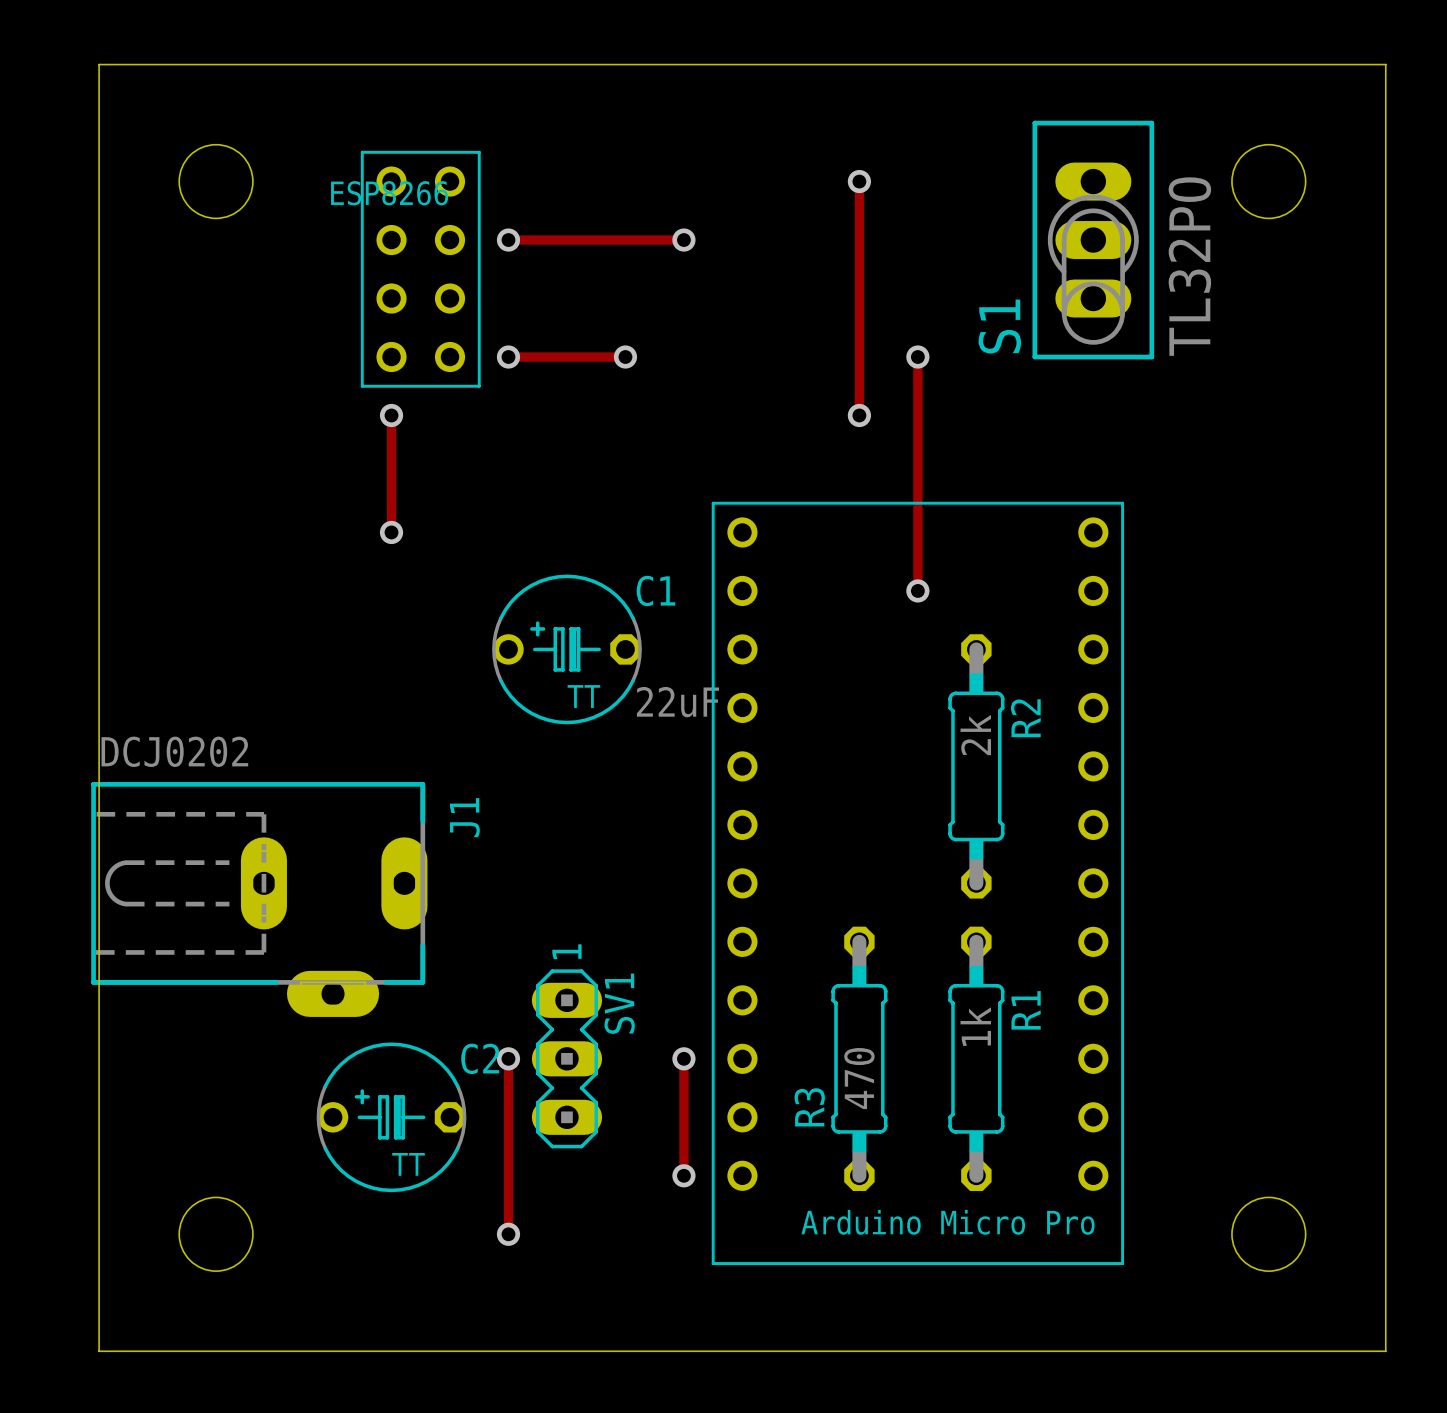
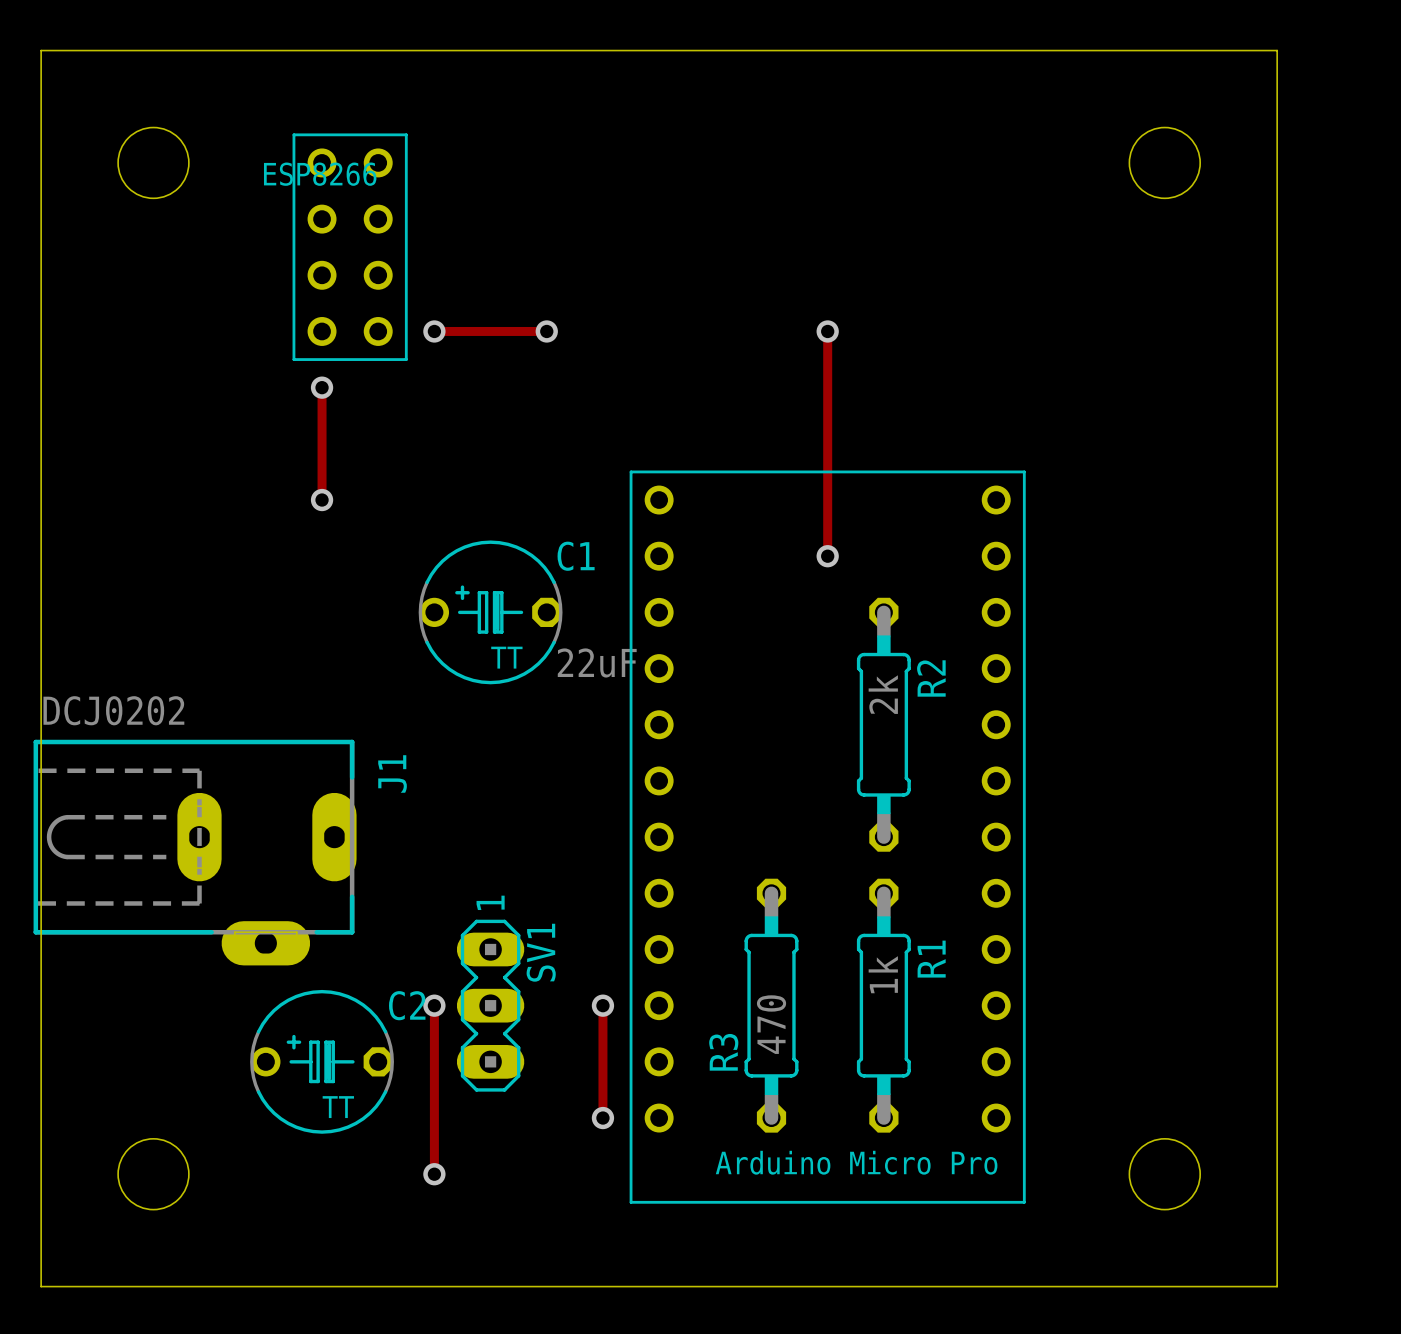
track: (859, 181) (859, 415) -> none
via: (859, 181) -> none
track: (508, 240) (683, 240) -> none
via: (508, 240) -> none
via: (683, 240) -> none
S1: TL32PO (1093, 240) -> none
via: (859, 415) -> none

